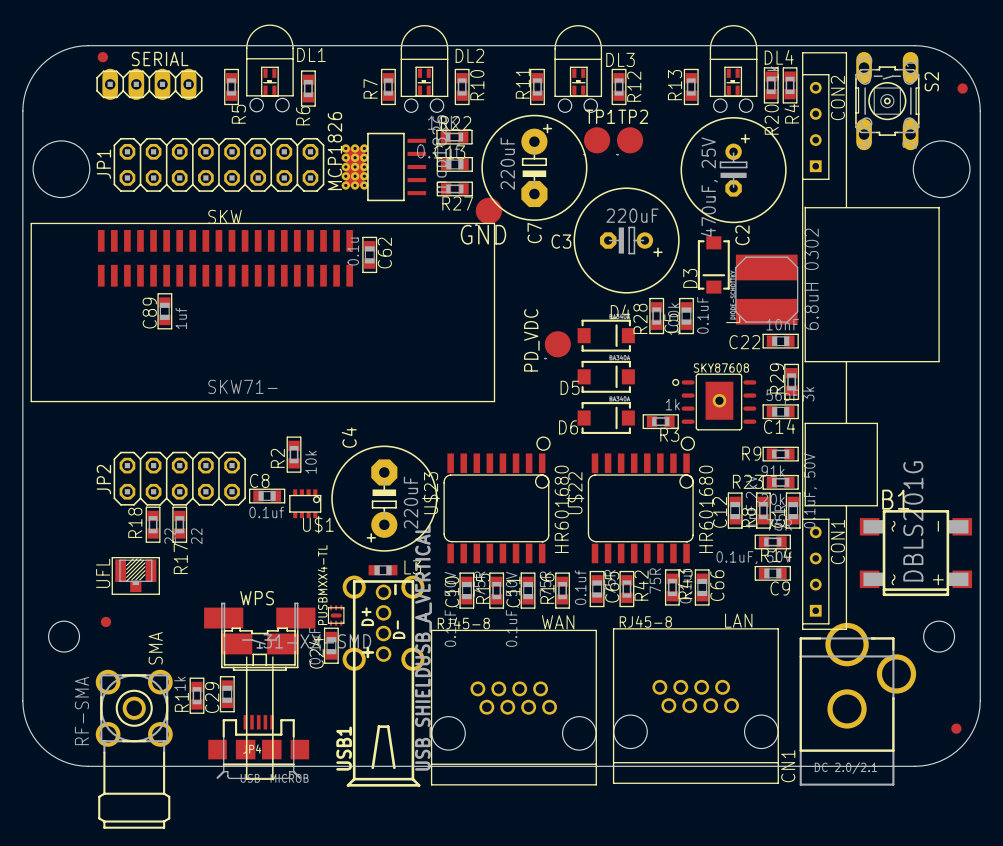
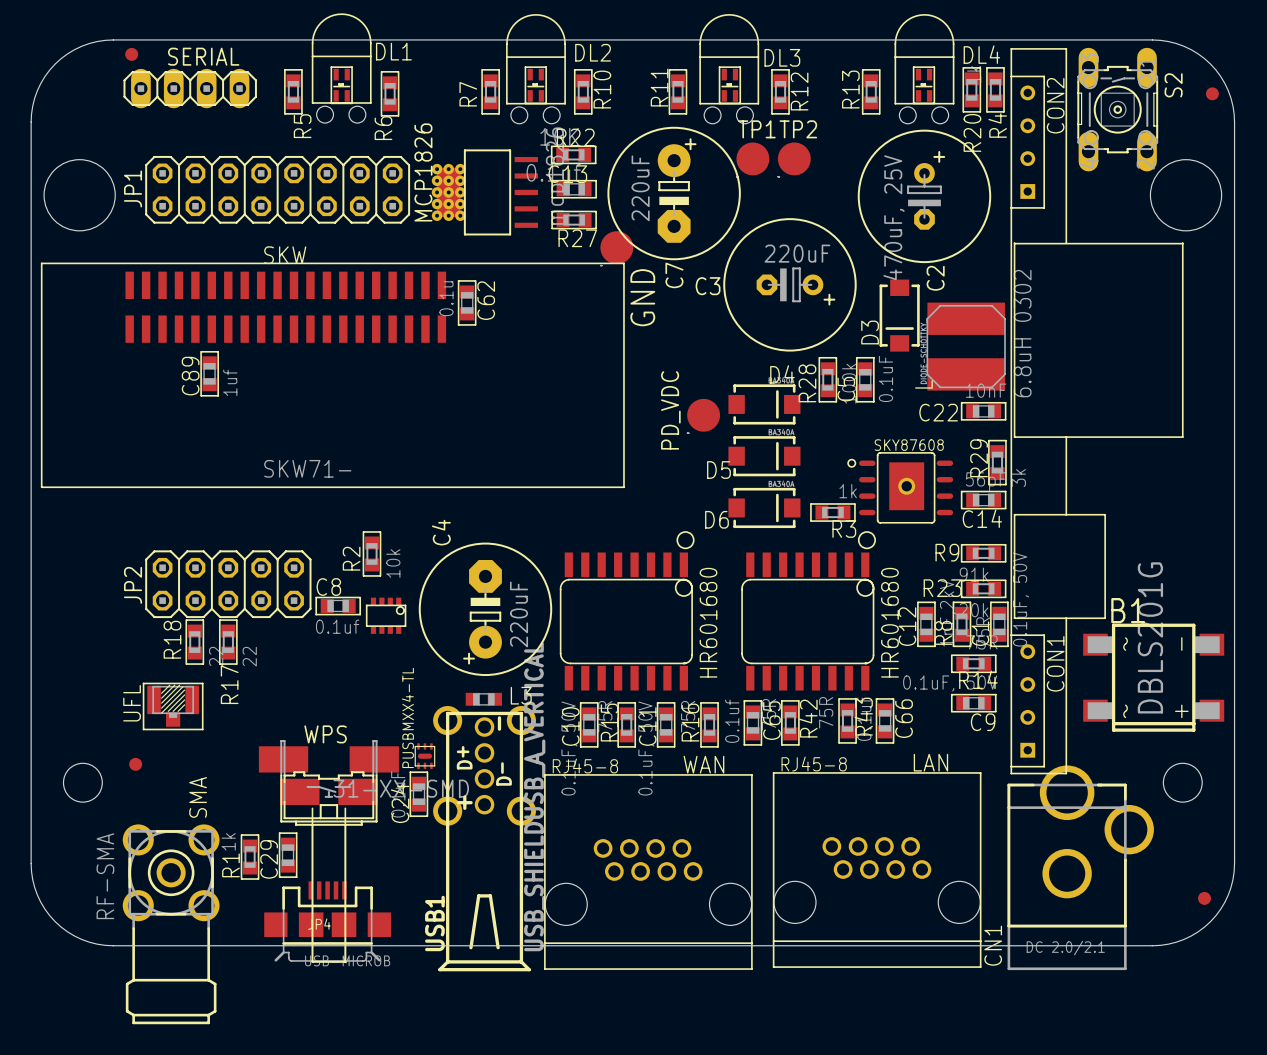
text rotation: 0° (483, 234) -> 90° counterclockwise (642, 297)
U$23 name: U$23 (431, 493) -> none
U$22 name: U$22 (575, 493) -> none
U$1 name: U$1 (318, 524) -> none

